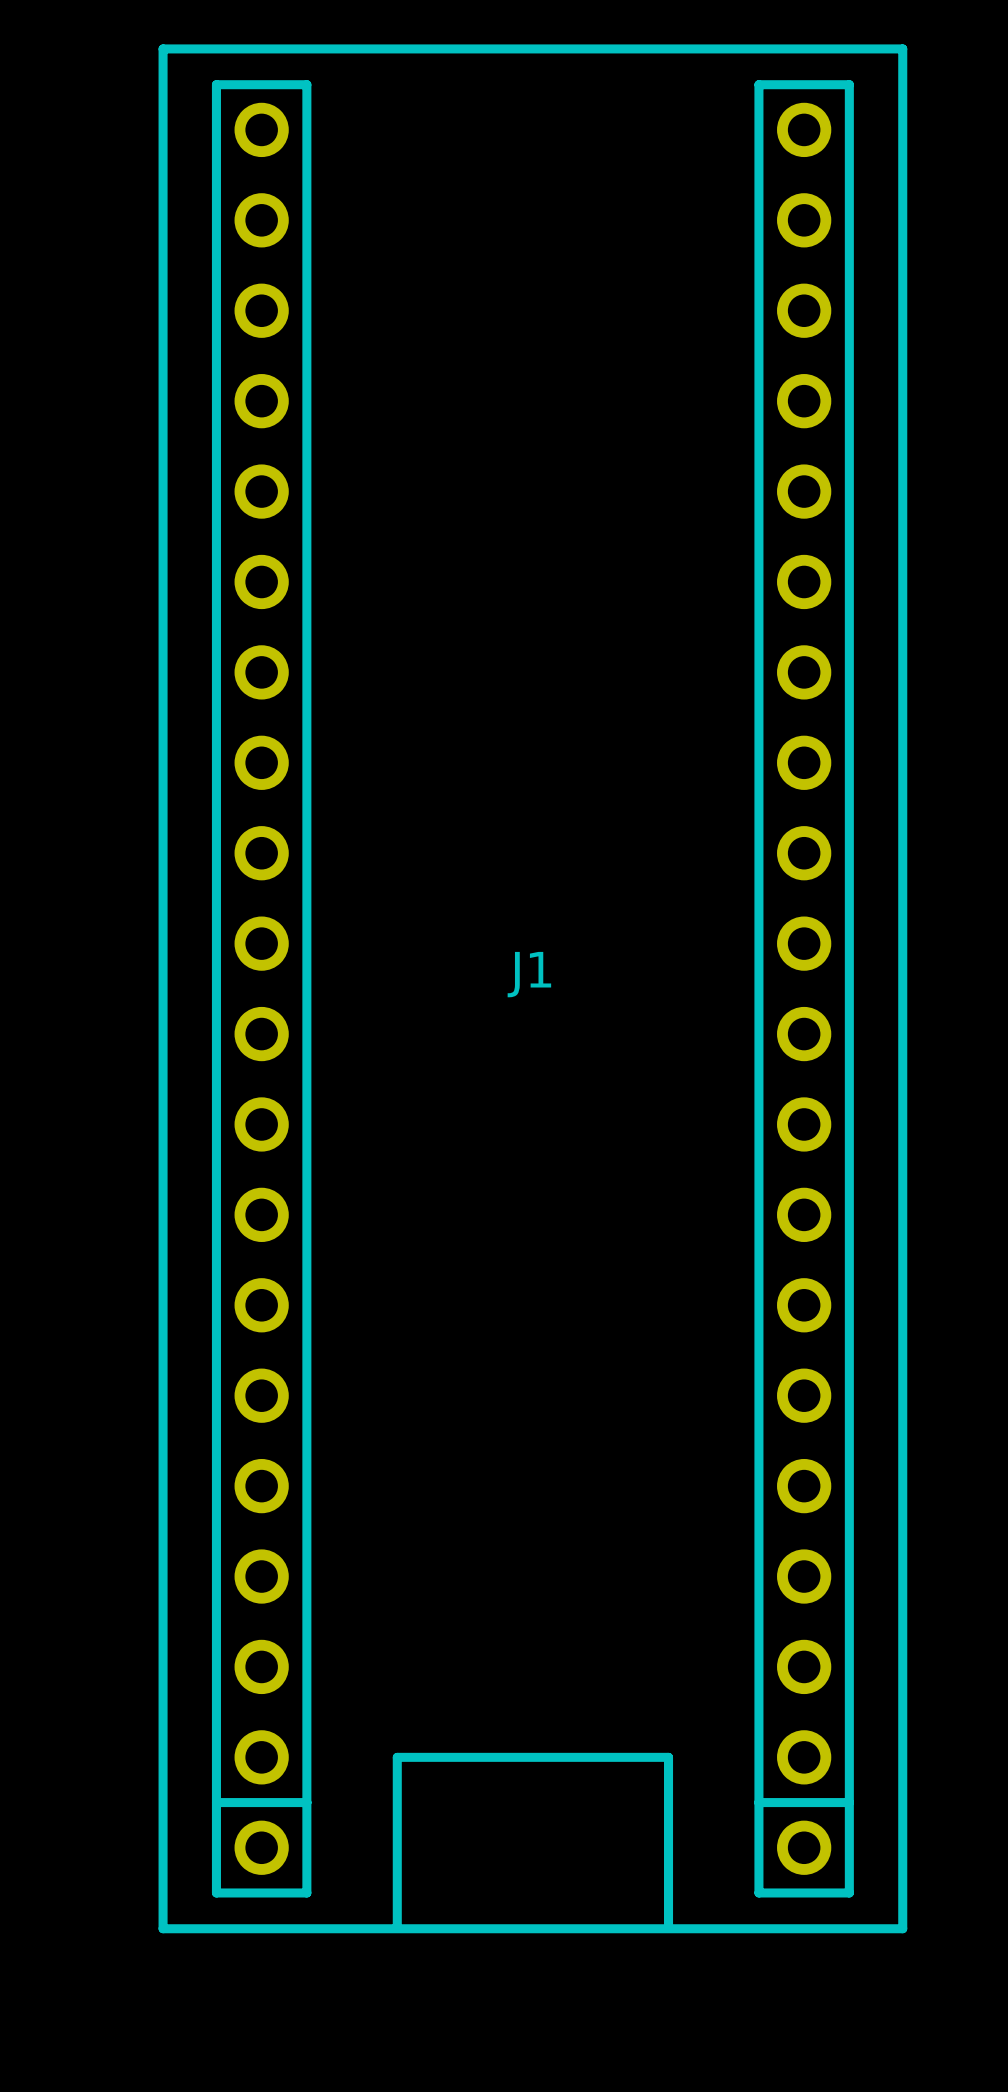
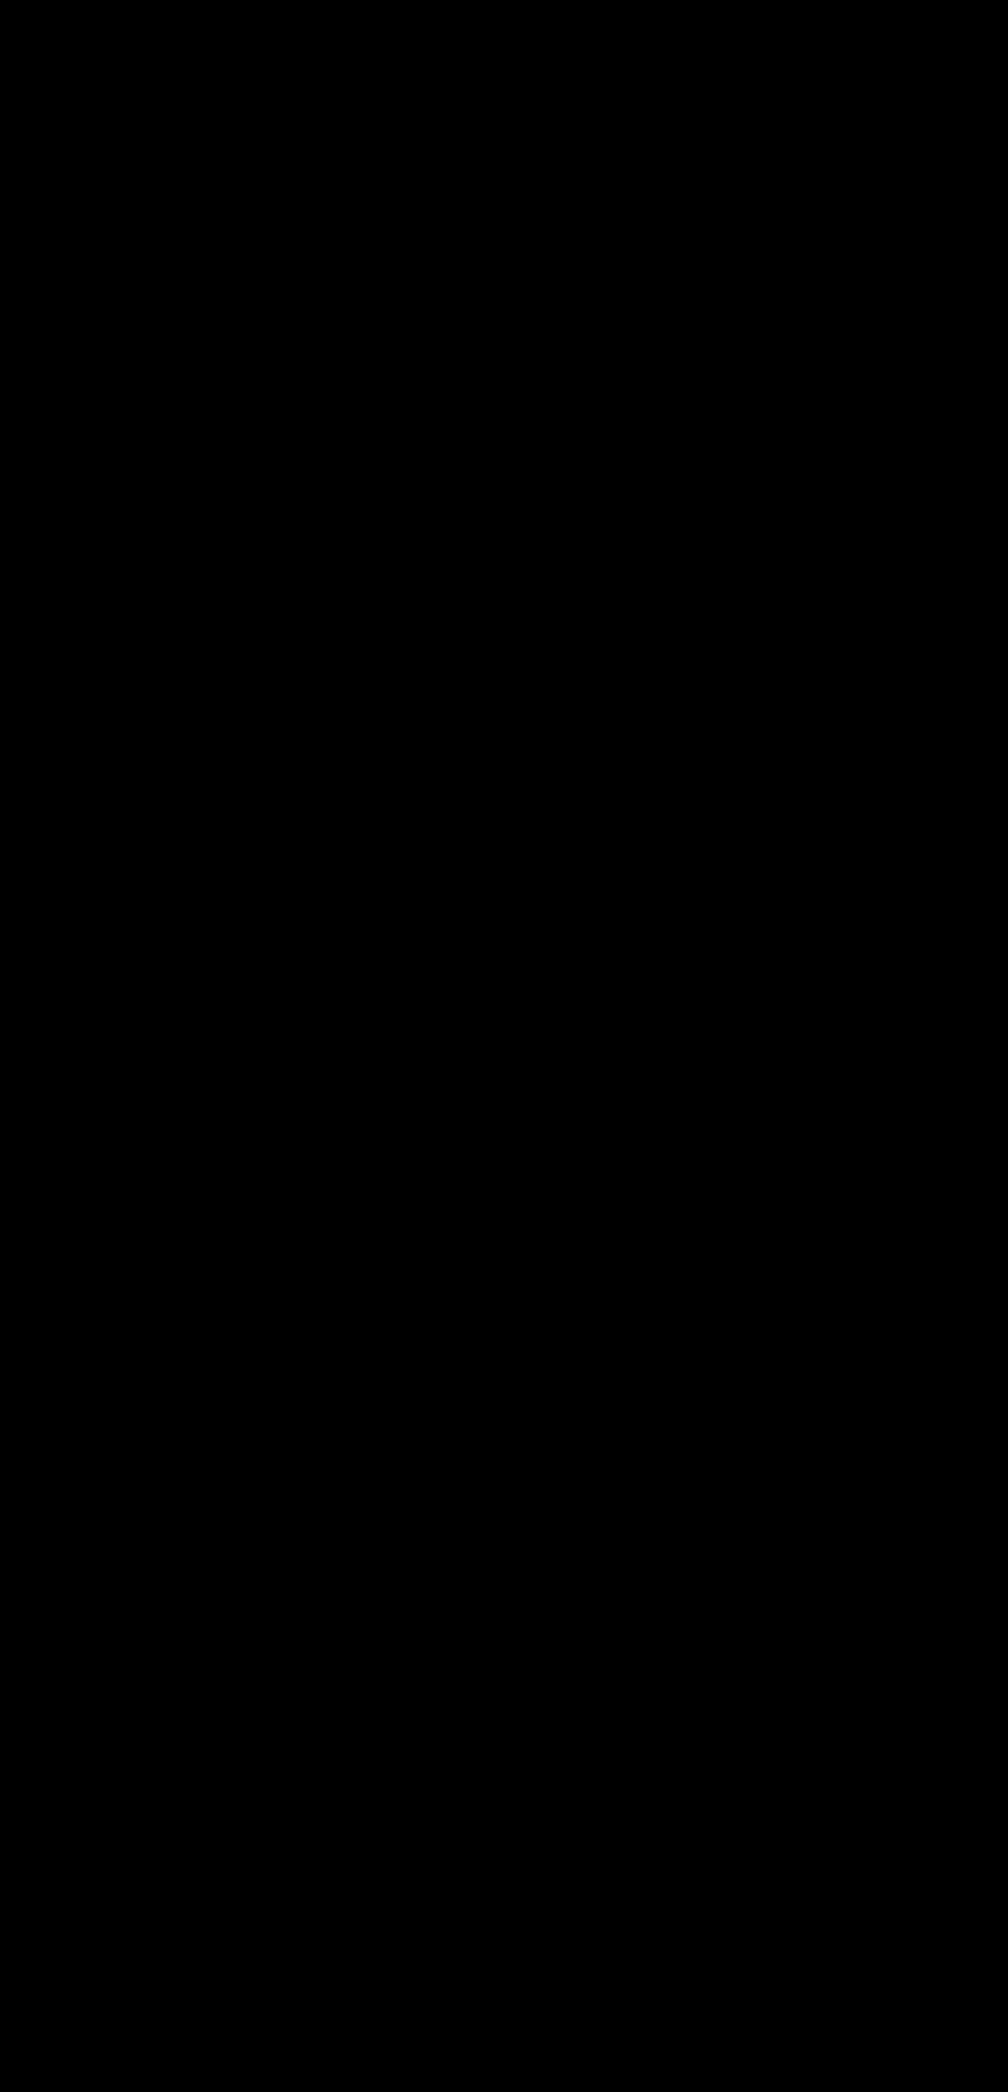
J1: (532, 988) -> none

